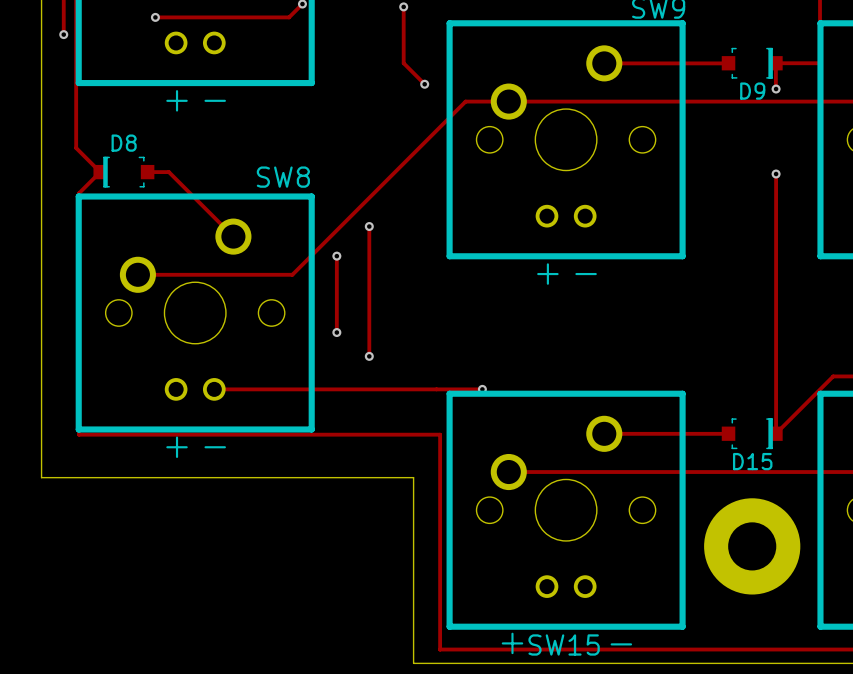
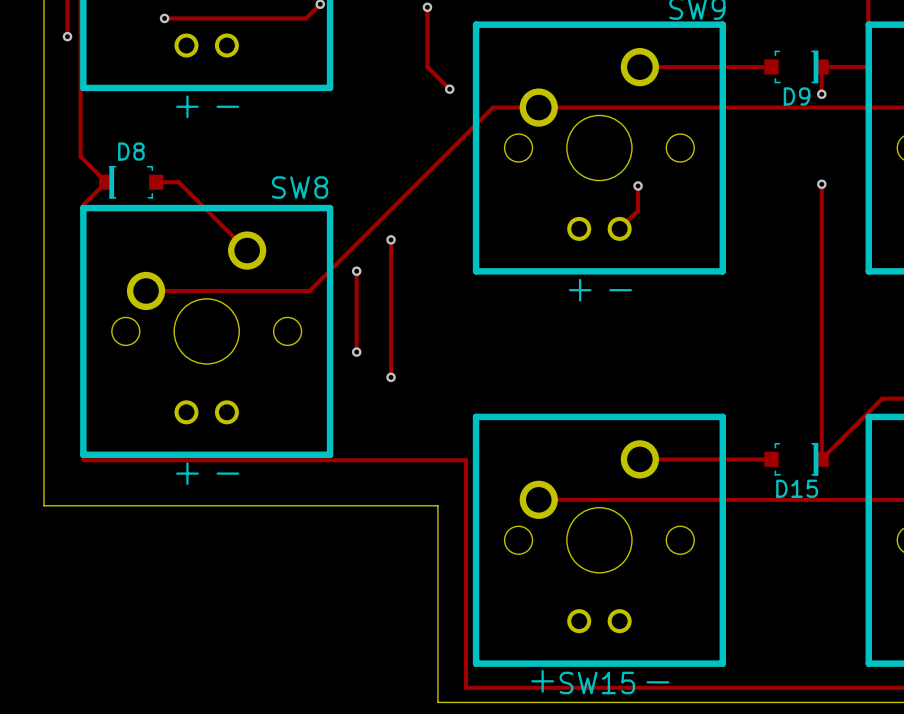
track: none -> (638, 185) (638, 210) (619, 228)
via: none -> (638, 185)
track: (214, 389) (482, 389) -> none
via: (482, 389) -> none
part: (752, 546) -> none

